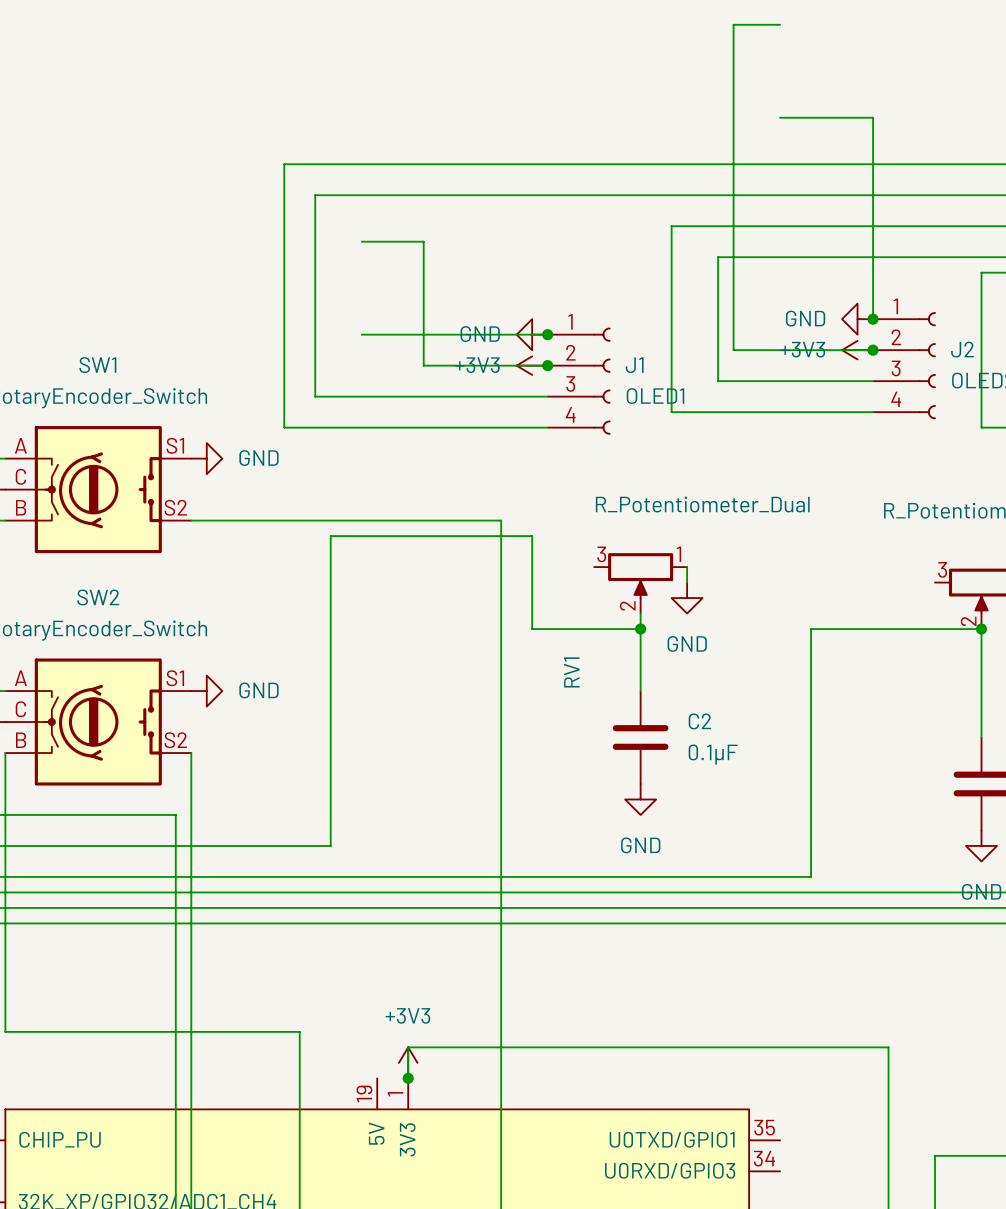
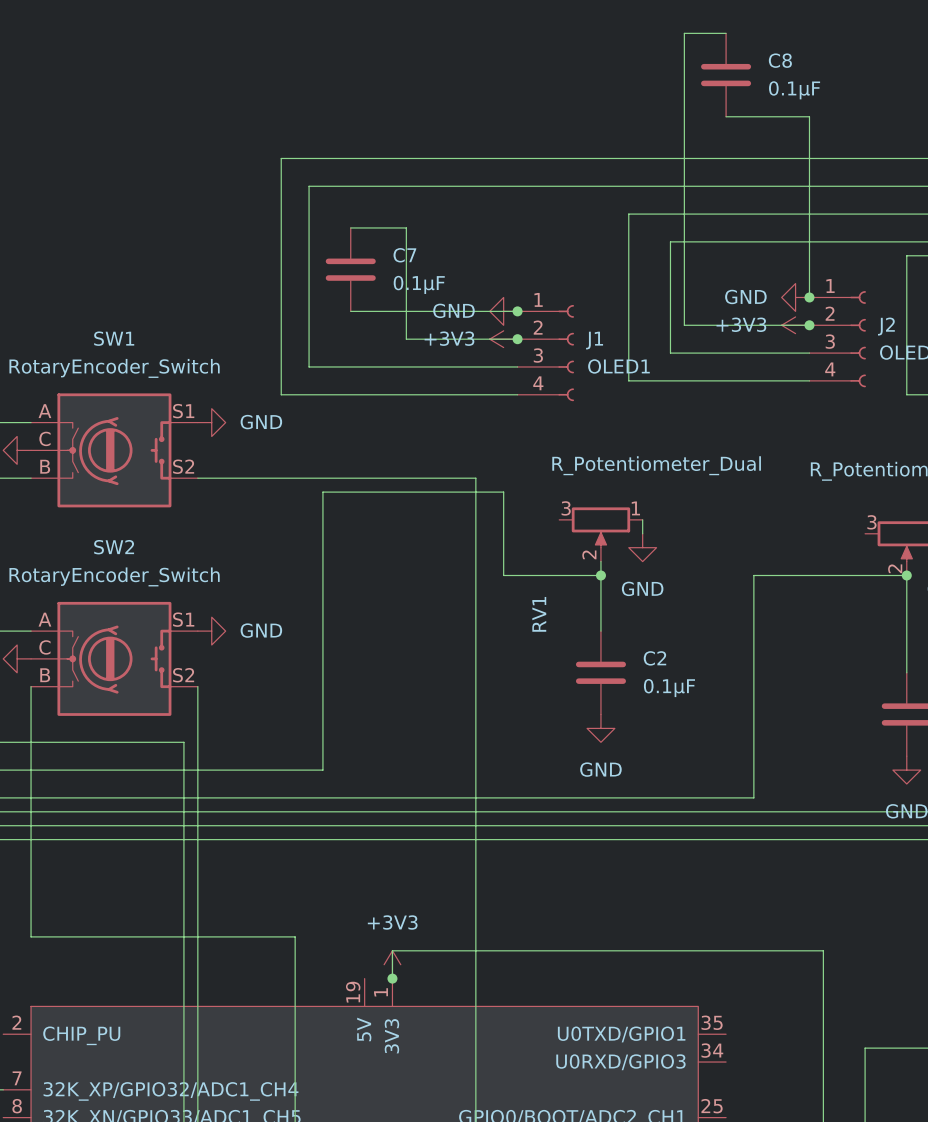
C8: none -> 0.1µF (726, 75)
C7: none -> 0.1µF (350, 269)

